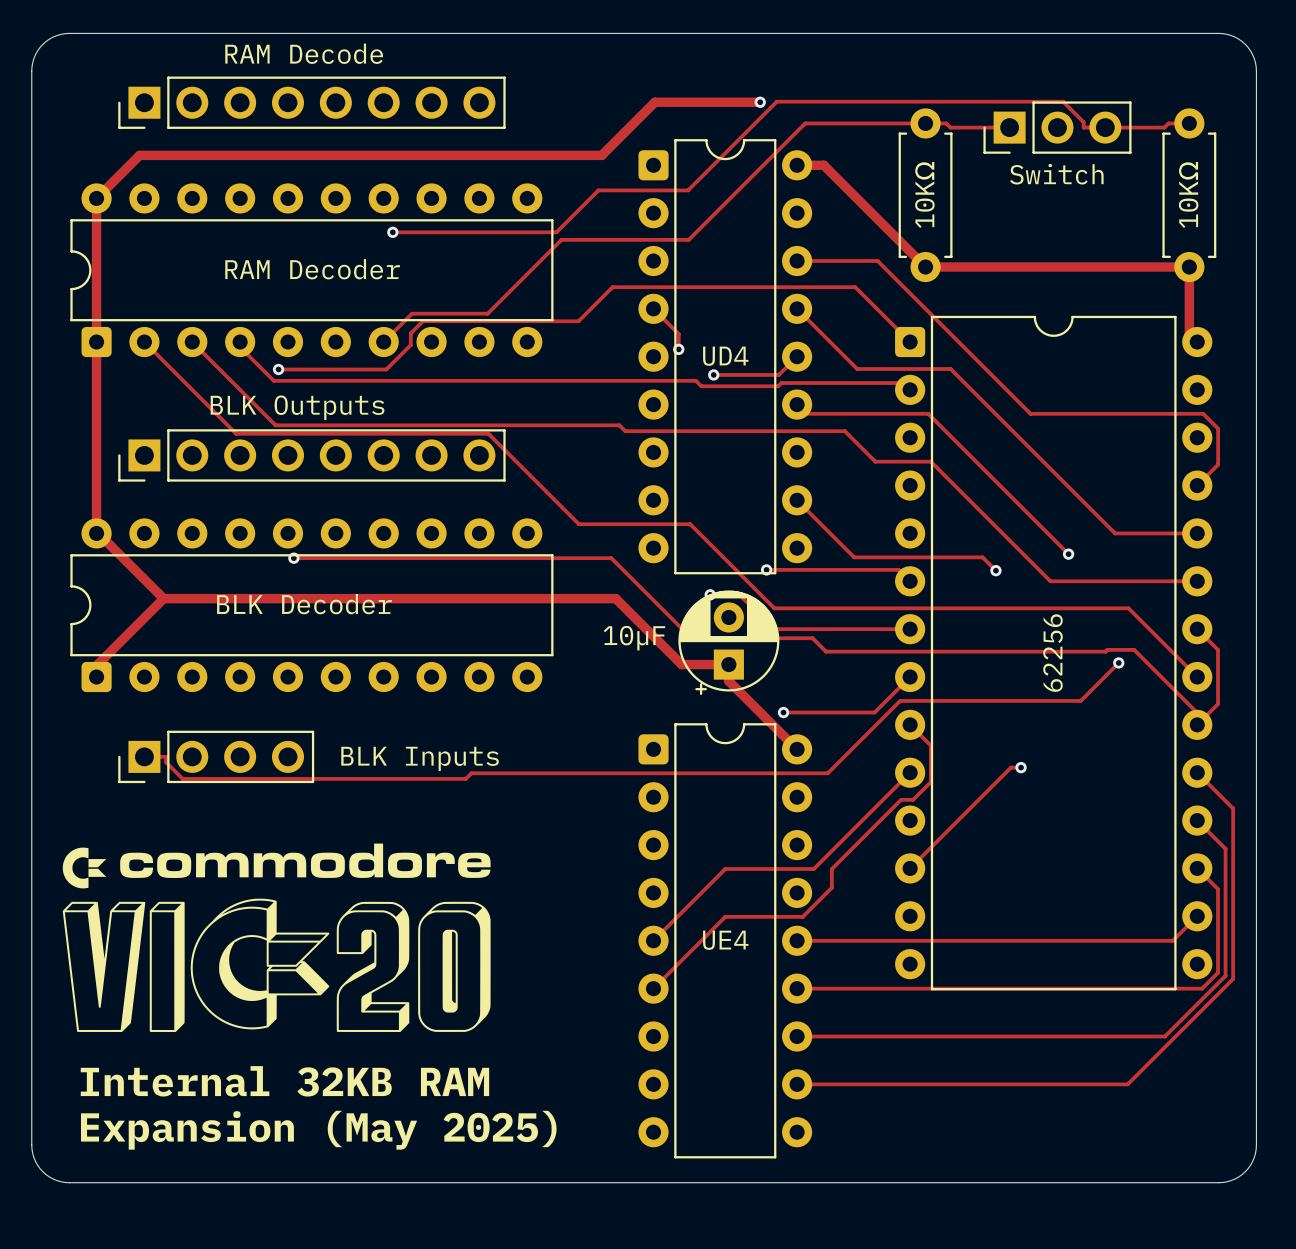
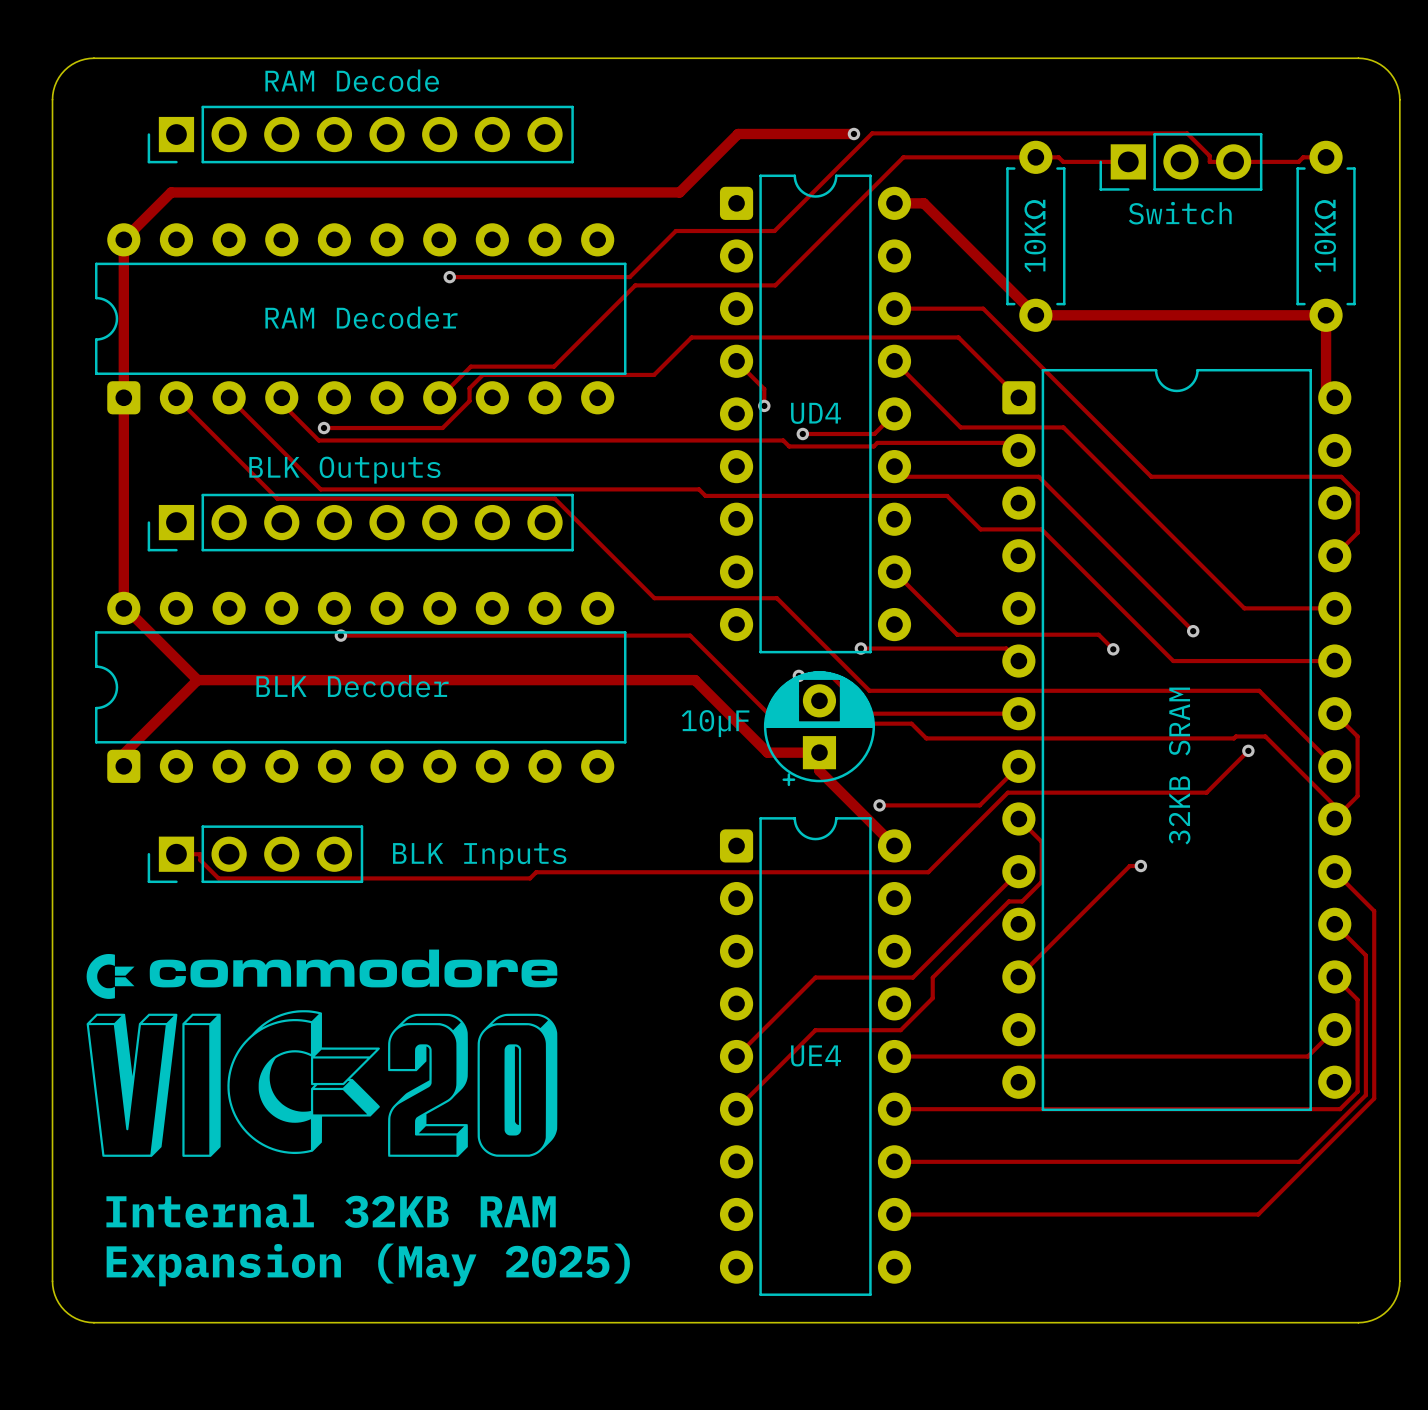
part value: 62256 (1053, 653) -> none
text: none -> 32KB SRAM (1179, 766)

